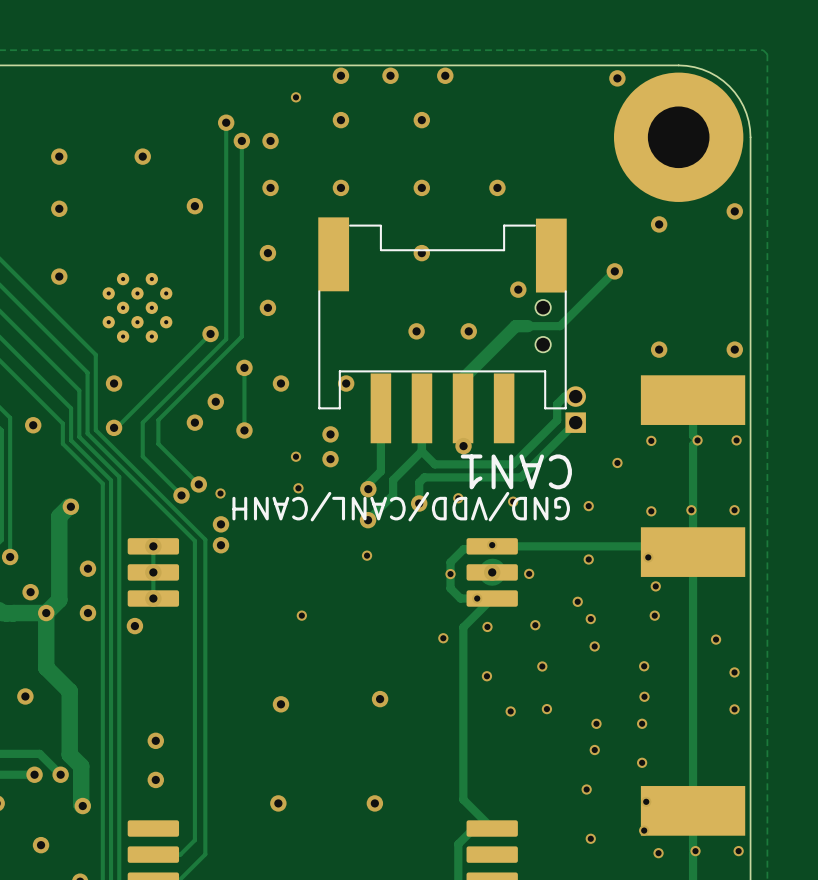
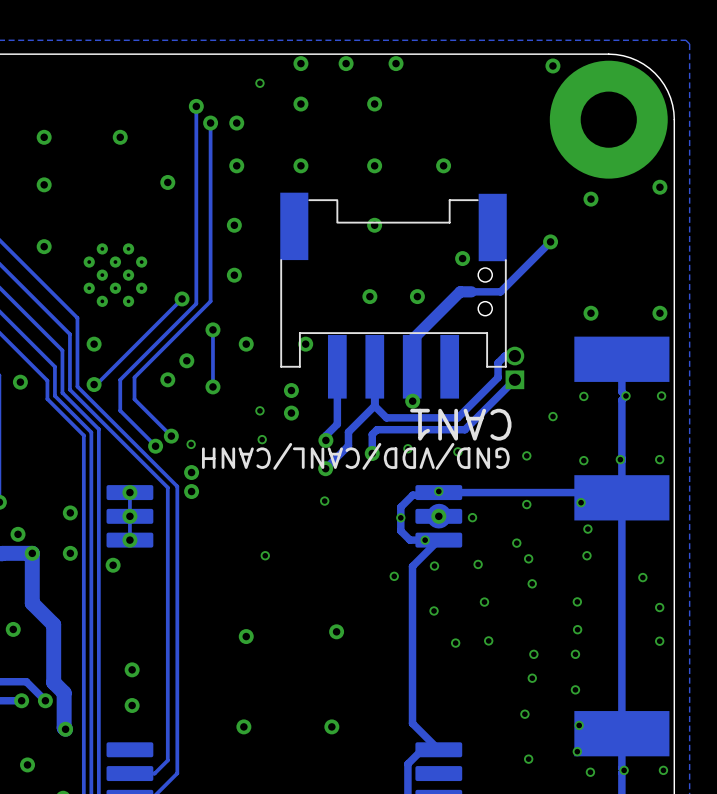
track: (70, 506) (59, 516) (59, 599) (46, 613) -> none
via: (70, 506) -> none

